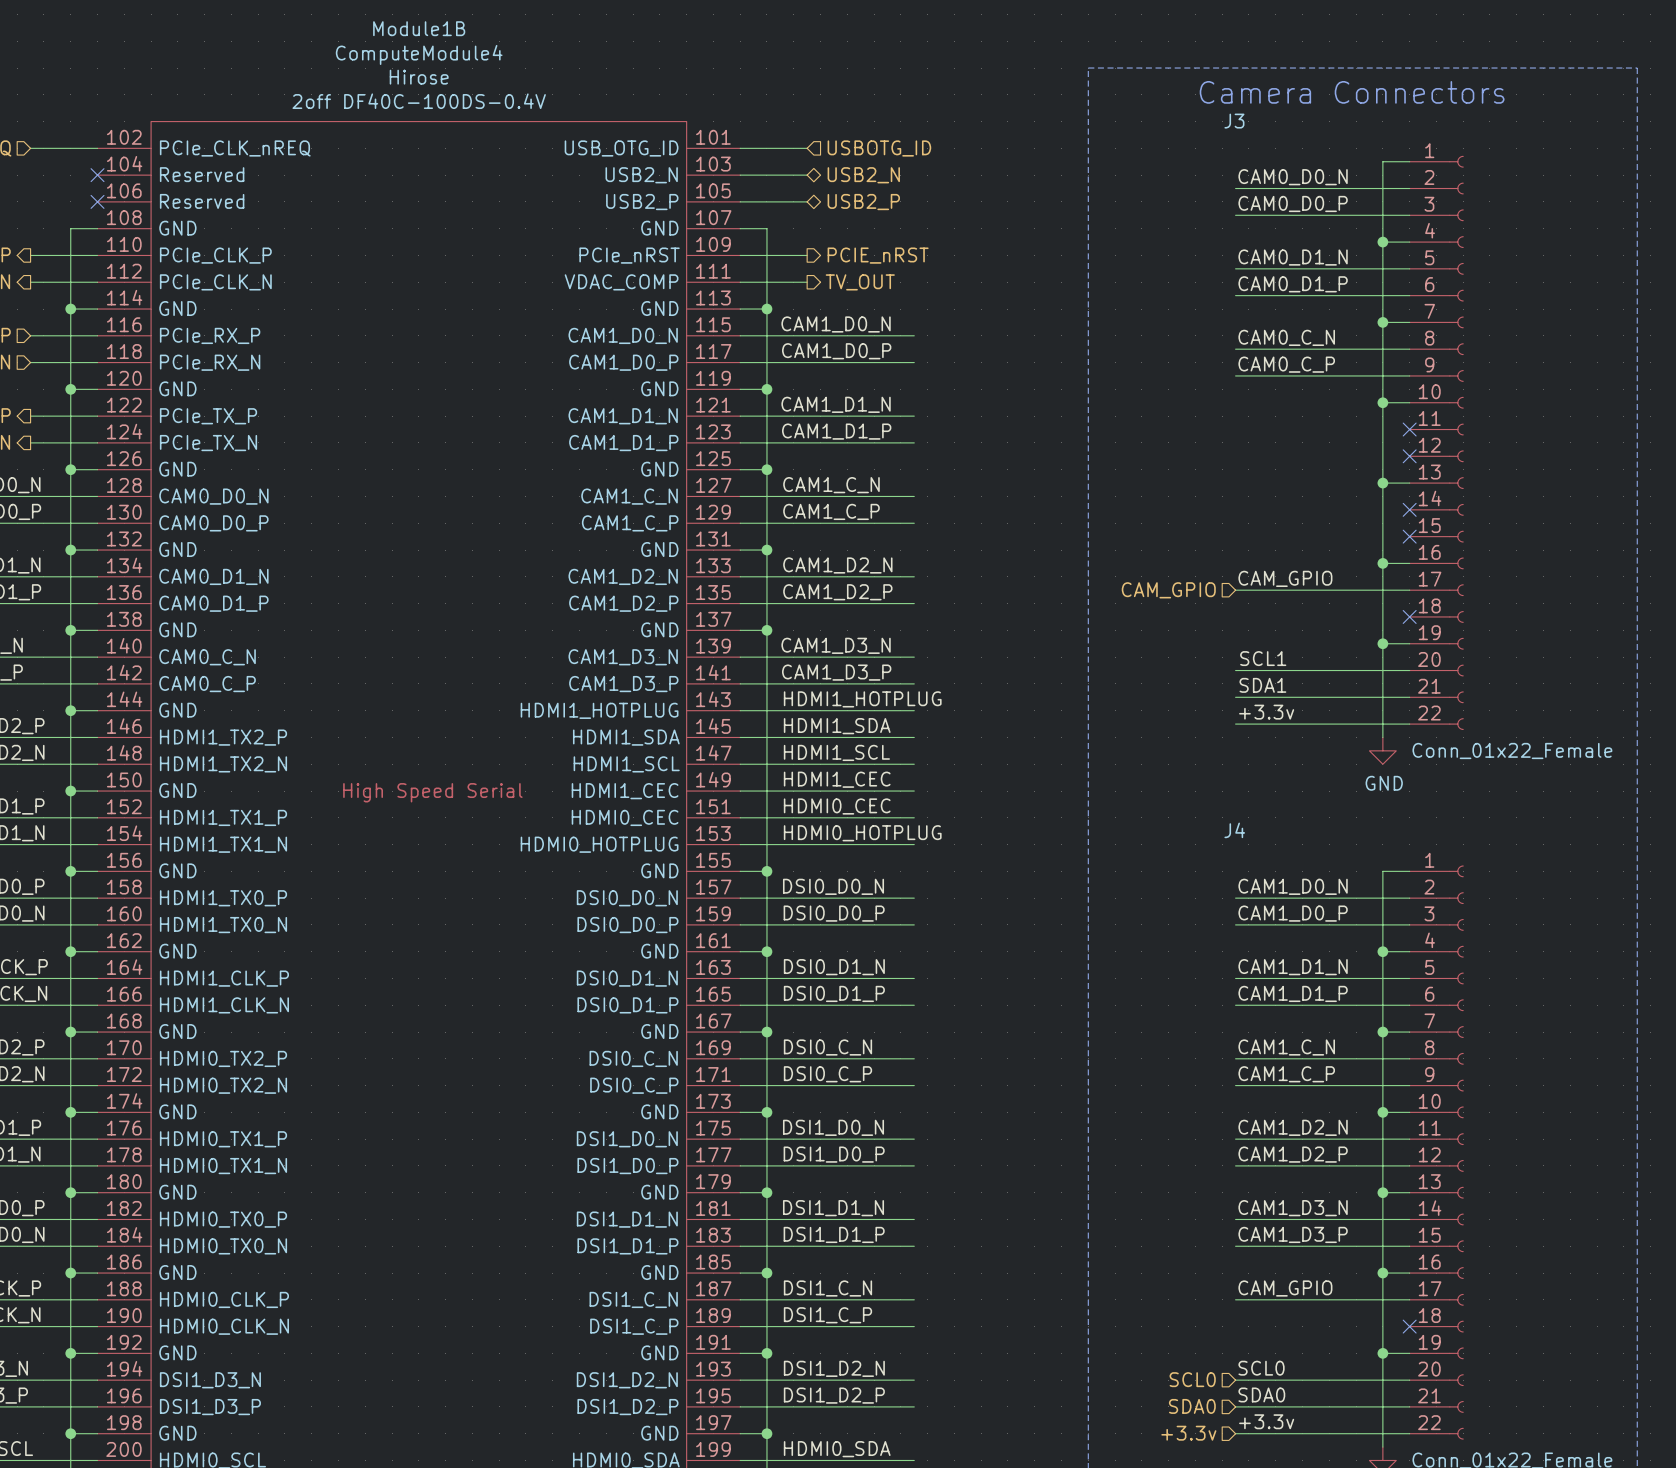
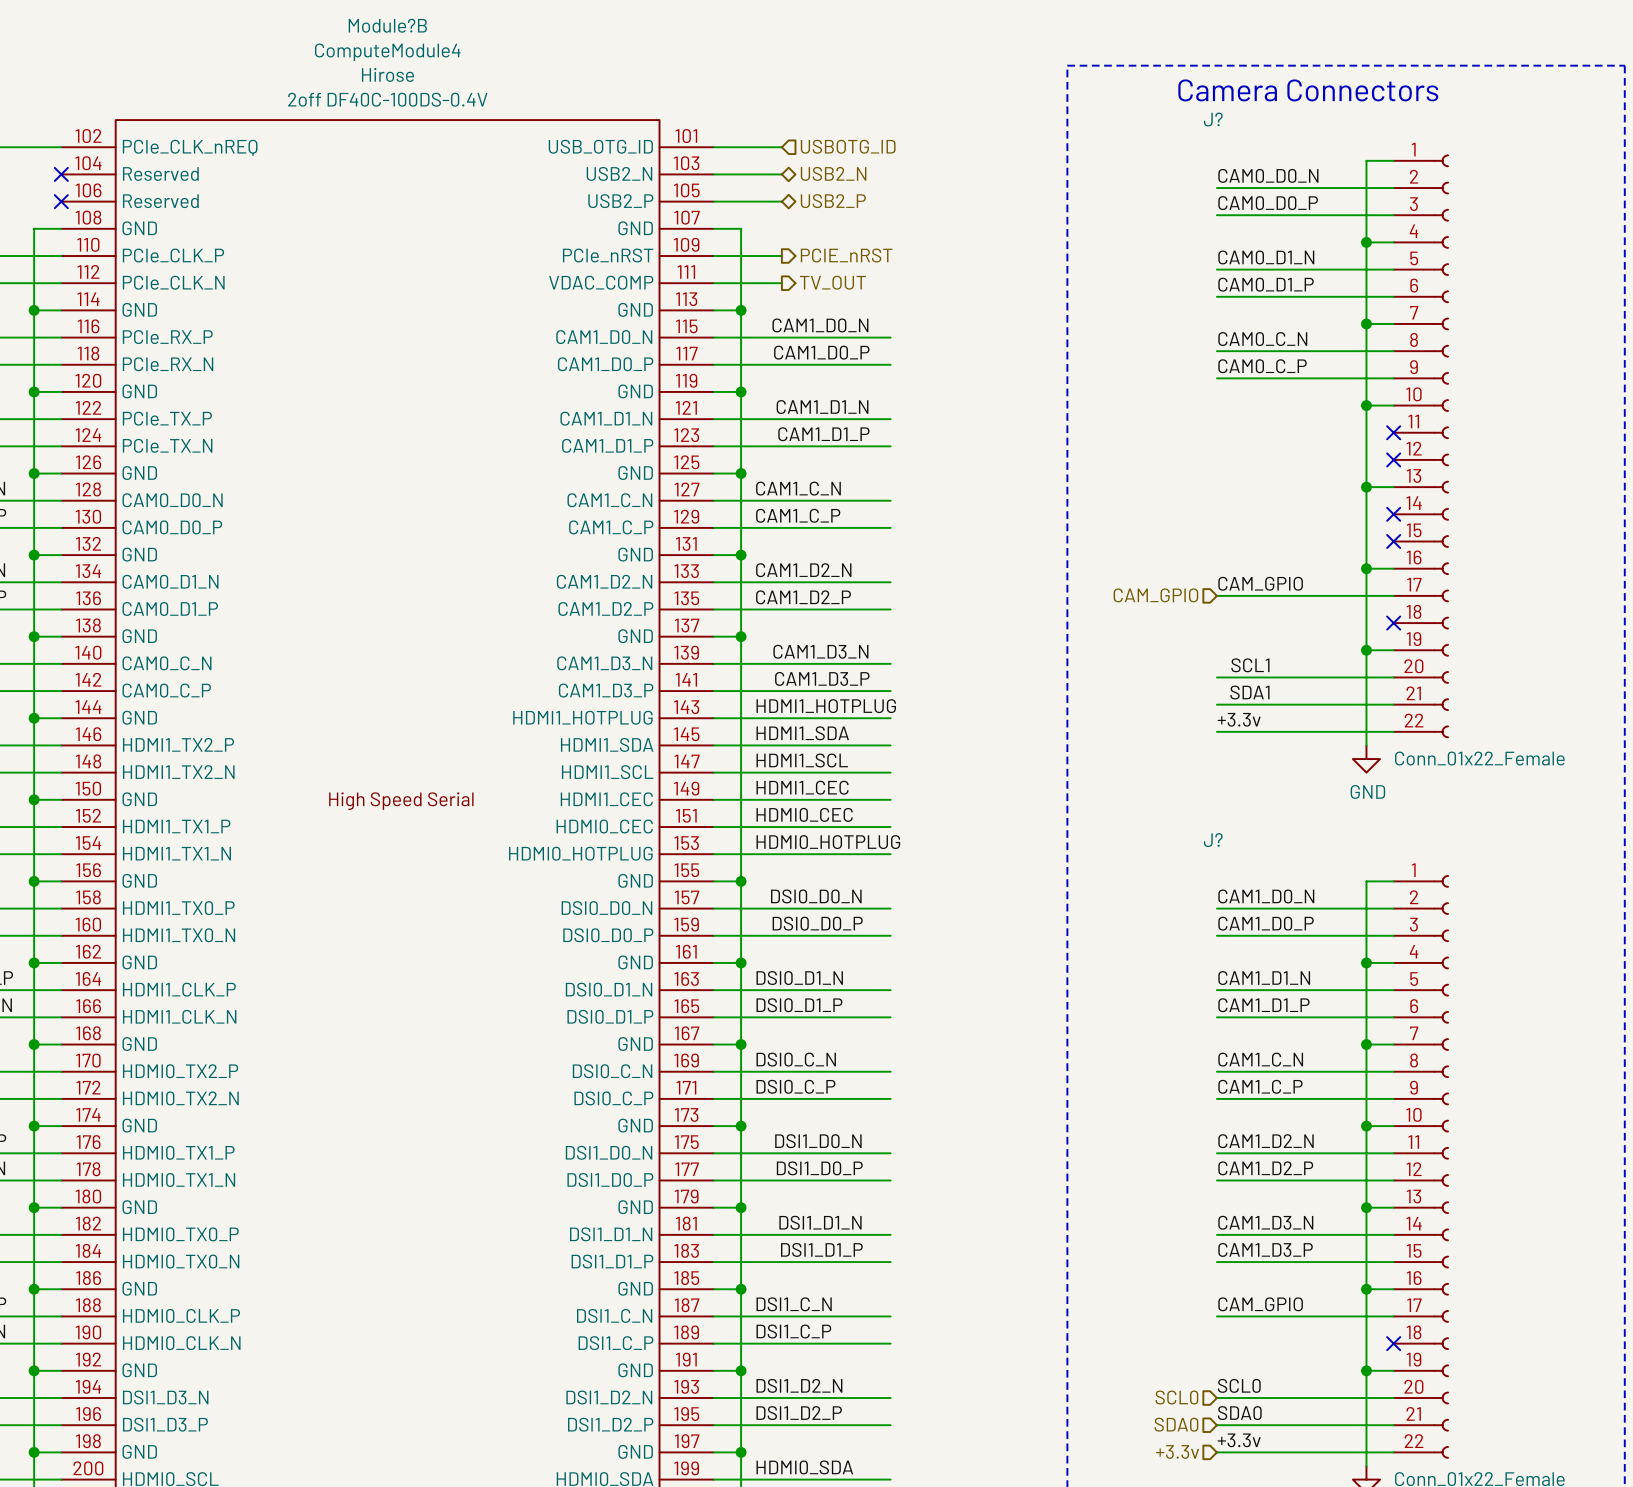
Module1B name: Module1B (419, 28) -> Module?B (387, 25)
J3 name: J3 (1234, 121) -> J? (1213, 119)
J4 name: J4 (1234, 830) -> J? (1213, 840)

